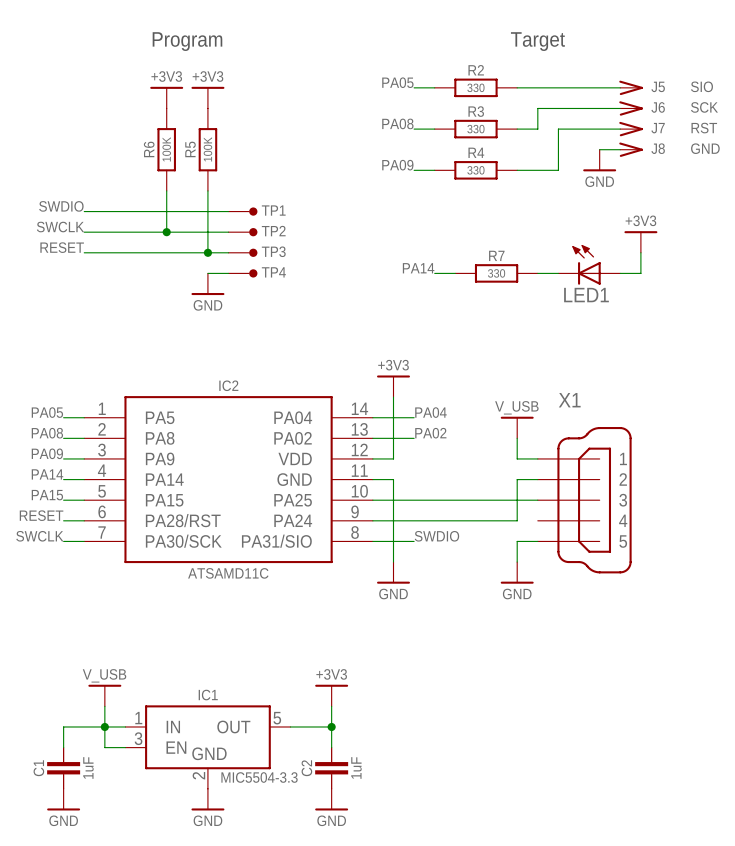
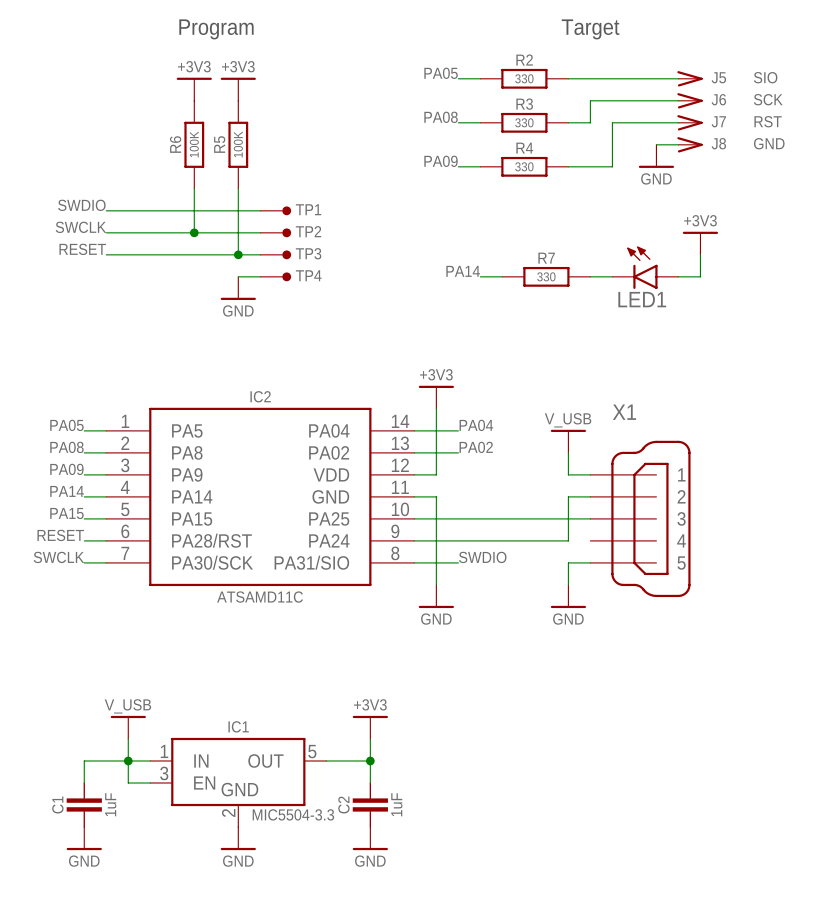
LED1 symbol: [558, 244, 621, 285] -> [612, 246, 679, 289]

